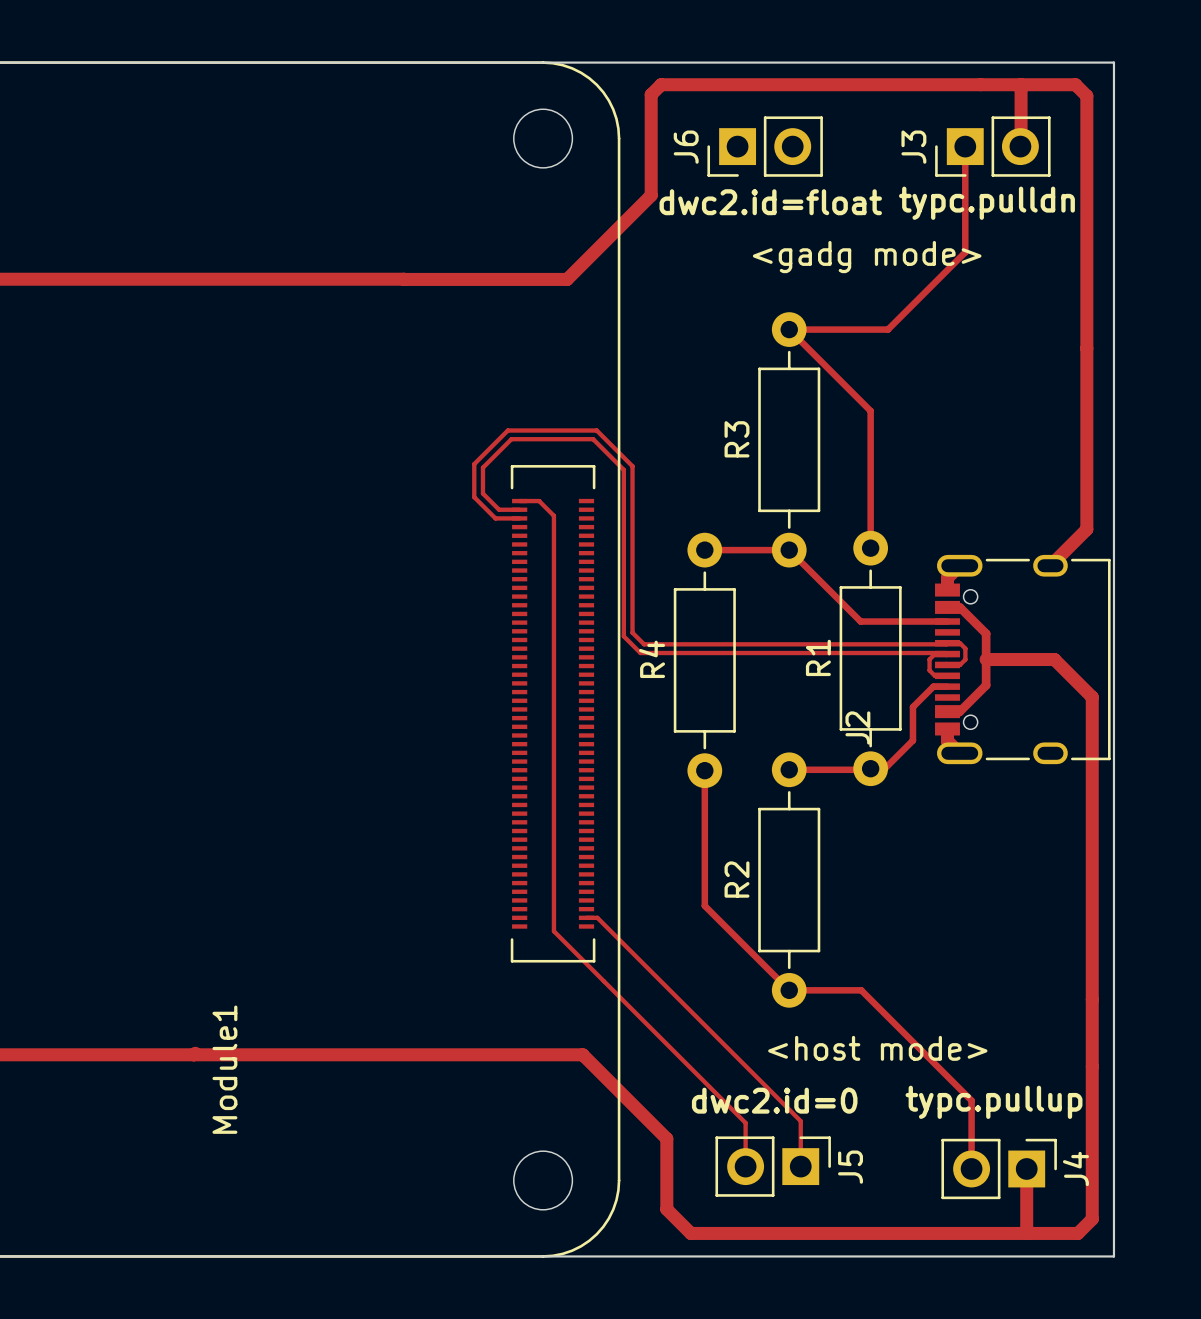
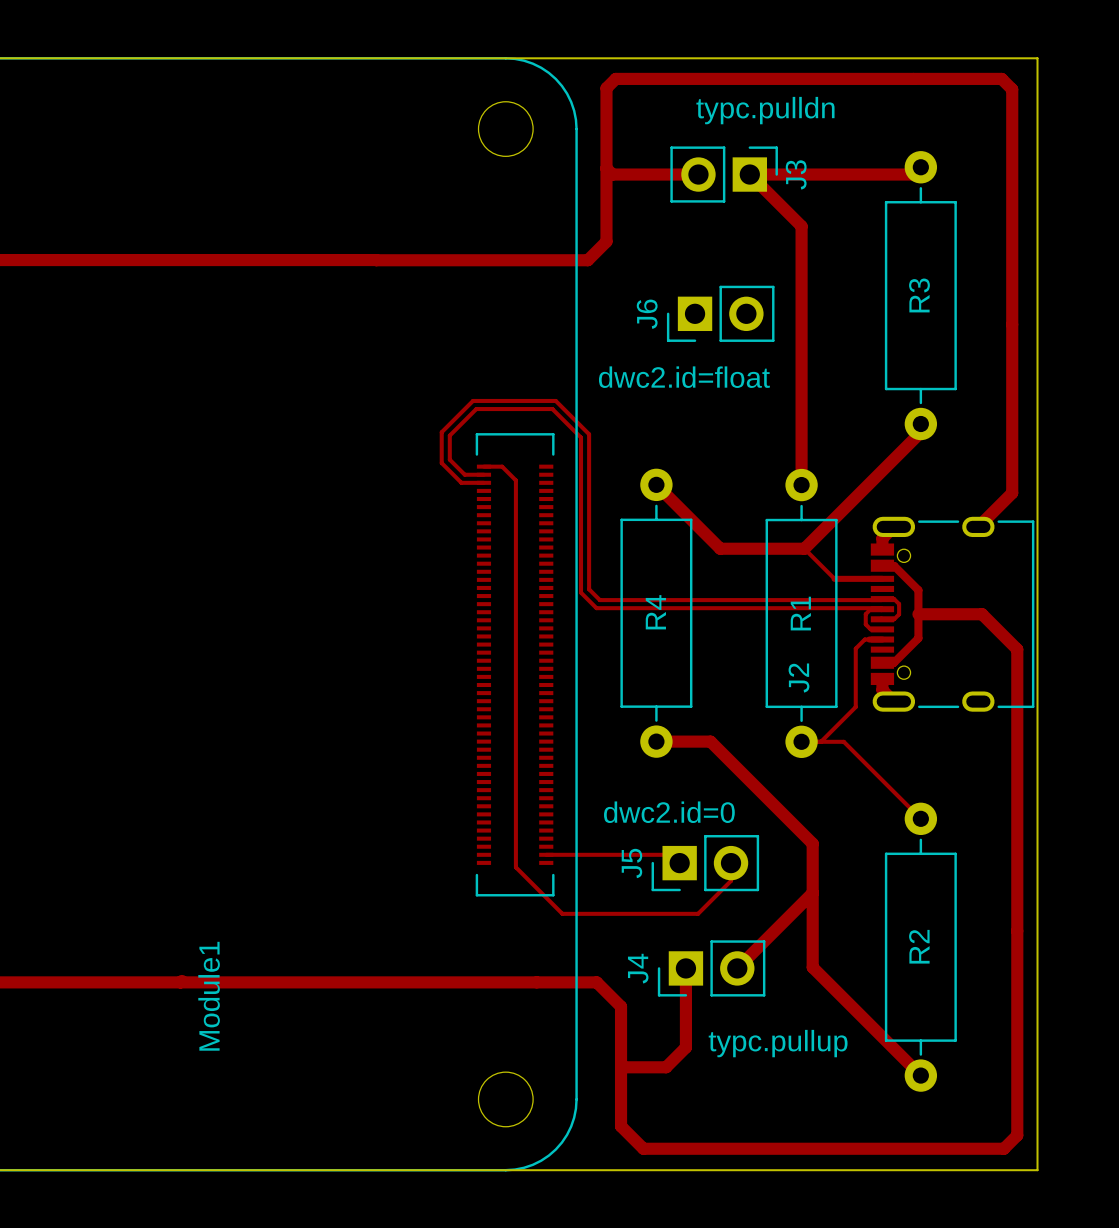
track: (1021, 84) (1020, 146) -> none
J6 position: (765, 146) -> (720, 313)
track: (965, 146) (965, 252) (888, 329) (789, 329) (870, 410) (870, 548) -> none
J3 rotation: 0° (992, 146) -> 180° (724, 174)
J3 position: (992, 146) -> (724, 174)
track: none -> (920, 167) (913, 174) (749, 174) (801, 226) (801, 485)
track: none -> (606, 168) (612, 174) (698, 174)
track: (651, 195) (567, 279) -> (606, 182) (606, 241) (587, 260) (528, 260)
text position: dwc2.id=float (770, 202) -> dwc2.id=float (684, 377)
text position: typc.pulldn (986, 203) -> typc.pulldn (765, 110)
text: <gadg mode> (867, 257) -> none
R3 footprint: [758, 312, 821, 568] -> [884, 151, 957, 441]
R3 name position: R3 (736, 439) -> R3 (919, 295)
track: none -> (920, 424) (920, 432) (804, 548)
track: none -> (656, 484) (720, 548) (804, 548)
R1 footprint: [839, 530, 902, 787] -> [765, 468, 838, 758]
R4 footprint: [673, 532, 736, 789] -> [620, 468, 693, 758]
track: (704, 550) (789, 550) (860, 621) (896, 621) -> (804, 548) (834, 578)
R1 name position: R1 (818, 657) -> R1 (800, 613)
R4 name position: R4 (652, 659) -> R4 (655, 612)
track: (933, 686) (912, 707) (912, 740) (884, 768) (789, 769) -> (869, 639) (864, 639) (855, 648) (855, 707) (820, 741)
R2 footprint: [758, 752, 821, 1008] -> [884, 802, 957, 1092]
track: (704, 770) (704, 905) (789, 990) (861, 990) (971, 1100) (971, 1168) -> none
track: none -> (656, 741) (710, 741) (812, 843) (812, 967) (920, 1075)
track: none -> (801, 741) (843, 741) (920, 818)
R2 name position: R2 (736, 879) -> R2 (919, 946)
track: (597, 917) (800, 1121) (800, 1166) -> (556, 854) (671, 854) (679, 863)
track: none -> (812, 893) (737, 968)
track: (603, 981) (745, 1122) (745, 1166) -> (562, 913) (698, 913) (731, 880) (731, 863)
track: none -> (685, 968) (685, 1047) (666, 1067) (621, 1067)
text: <host mode> (877, 1048) -> none
track: (582, 1054) (666, 1138) -> (542, 982) (596, 982) (621, 1006) (621, 1060)
text position: dwc2.id=0 (774, 1100) -> dwc2.id=0 (669, 812)
text position: typc.pullup (993, 1102) -> typc.pullup (778, 1043)
J5 rotation: 0° (773, 1166) -> 180° (705, 863)
J5 position: (773, 1166) -> (705, 863)
J4 rotation: 0° (999, 1168) -> 180° (711, 968)
J4 position: (999, 1168) -> (711, 968)
track: (1026, 1168) (1027, 1233) -> none

